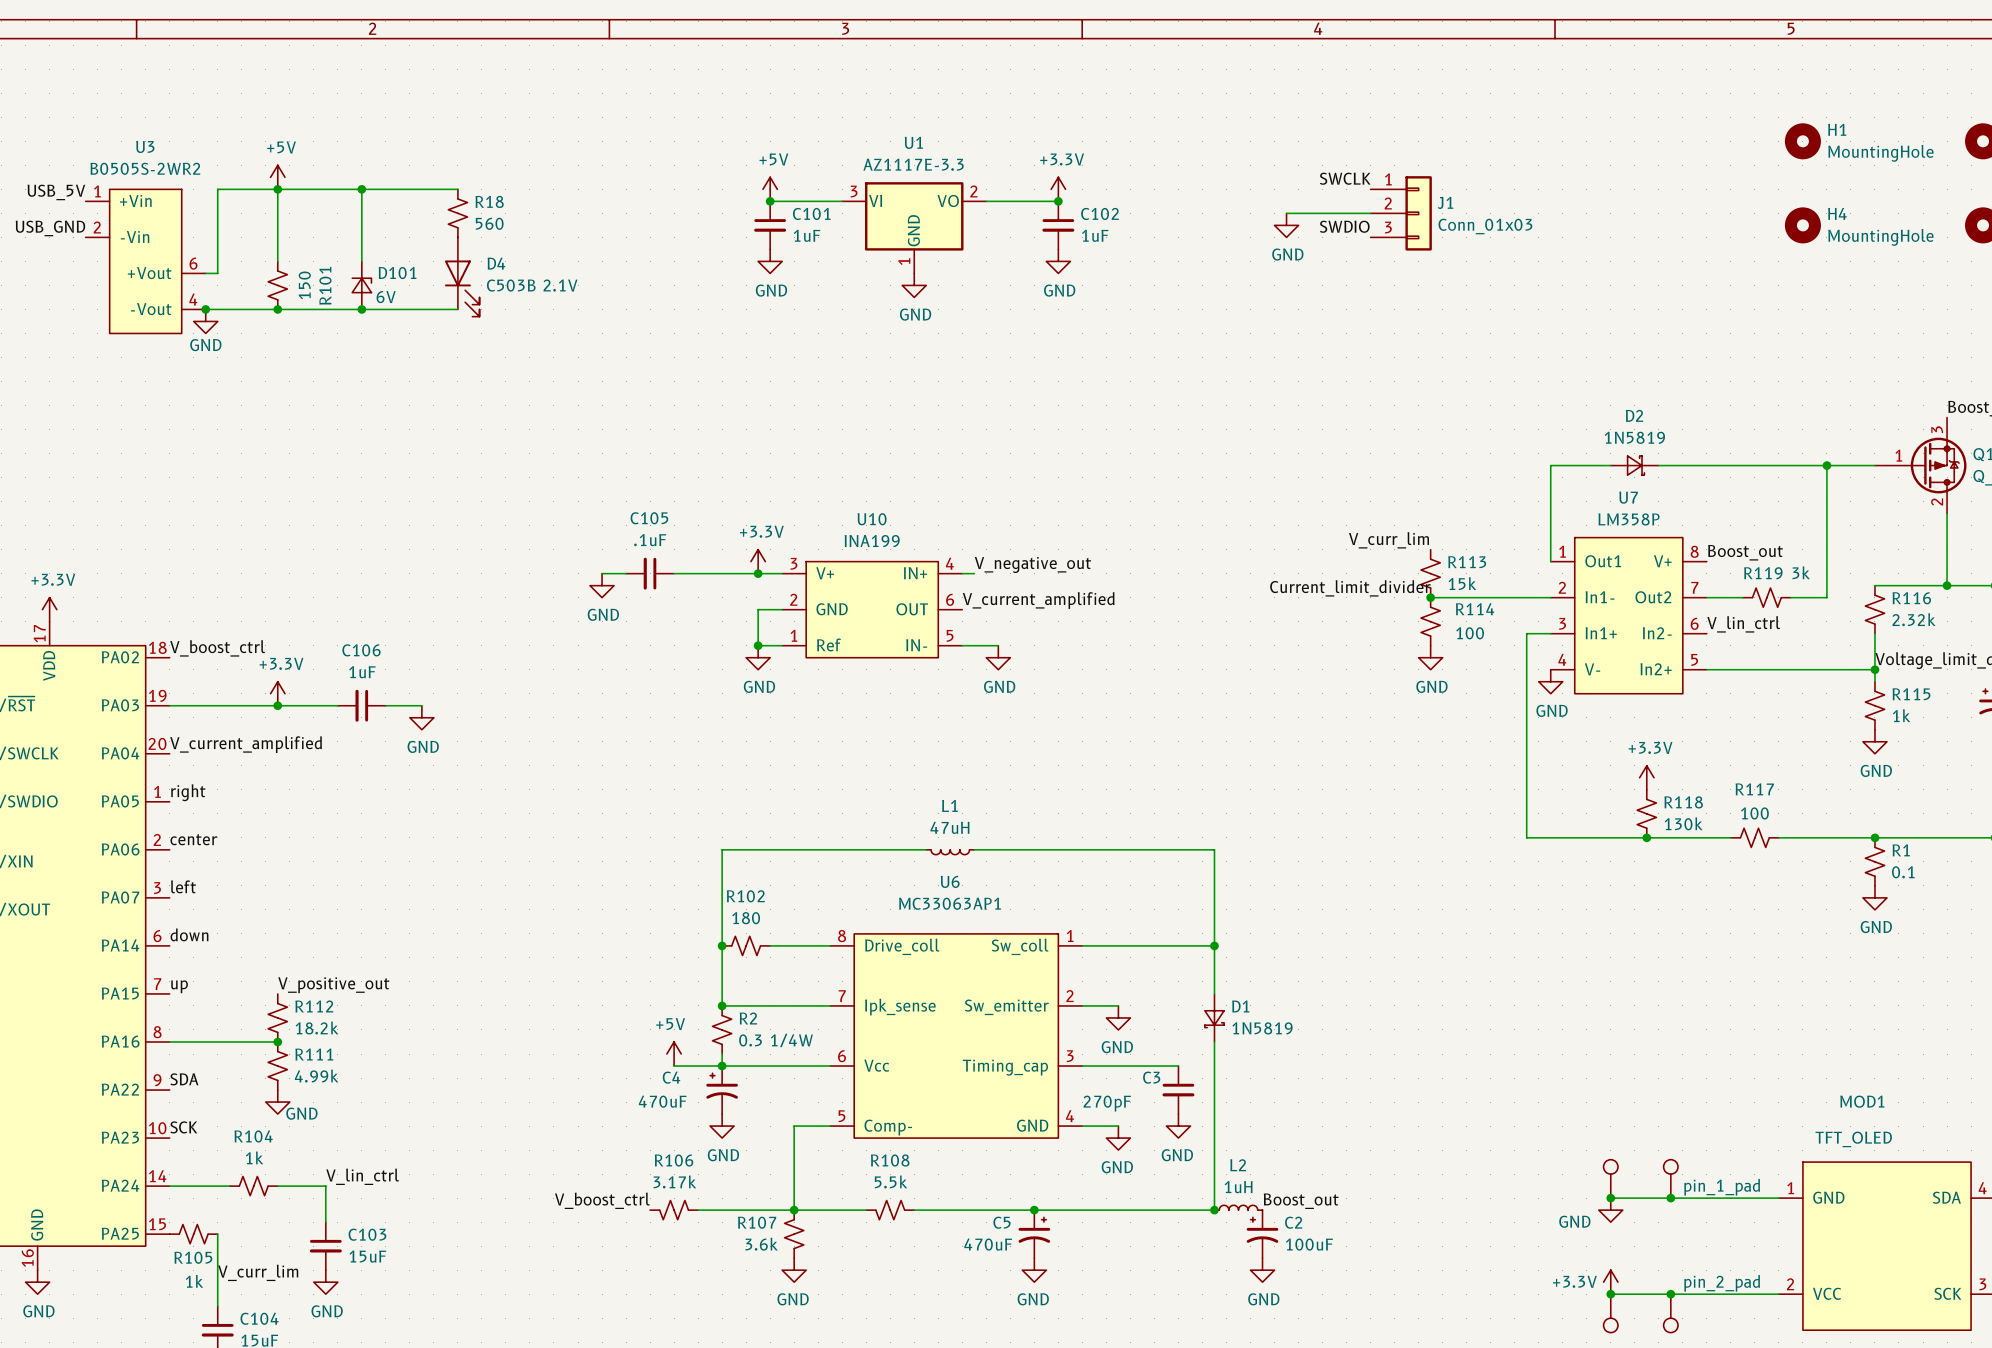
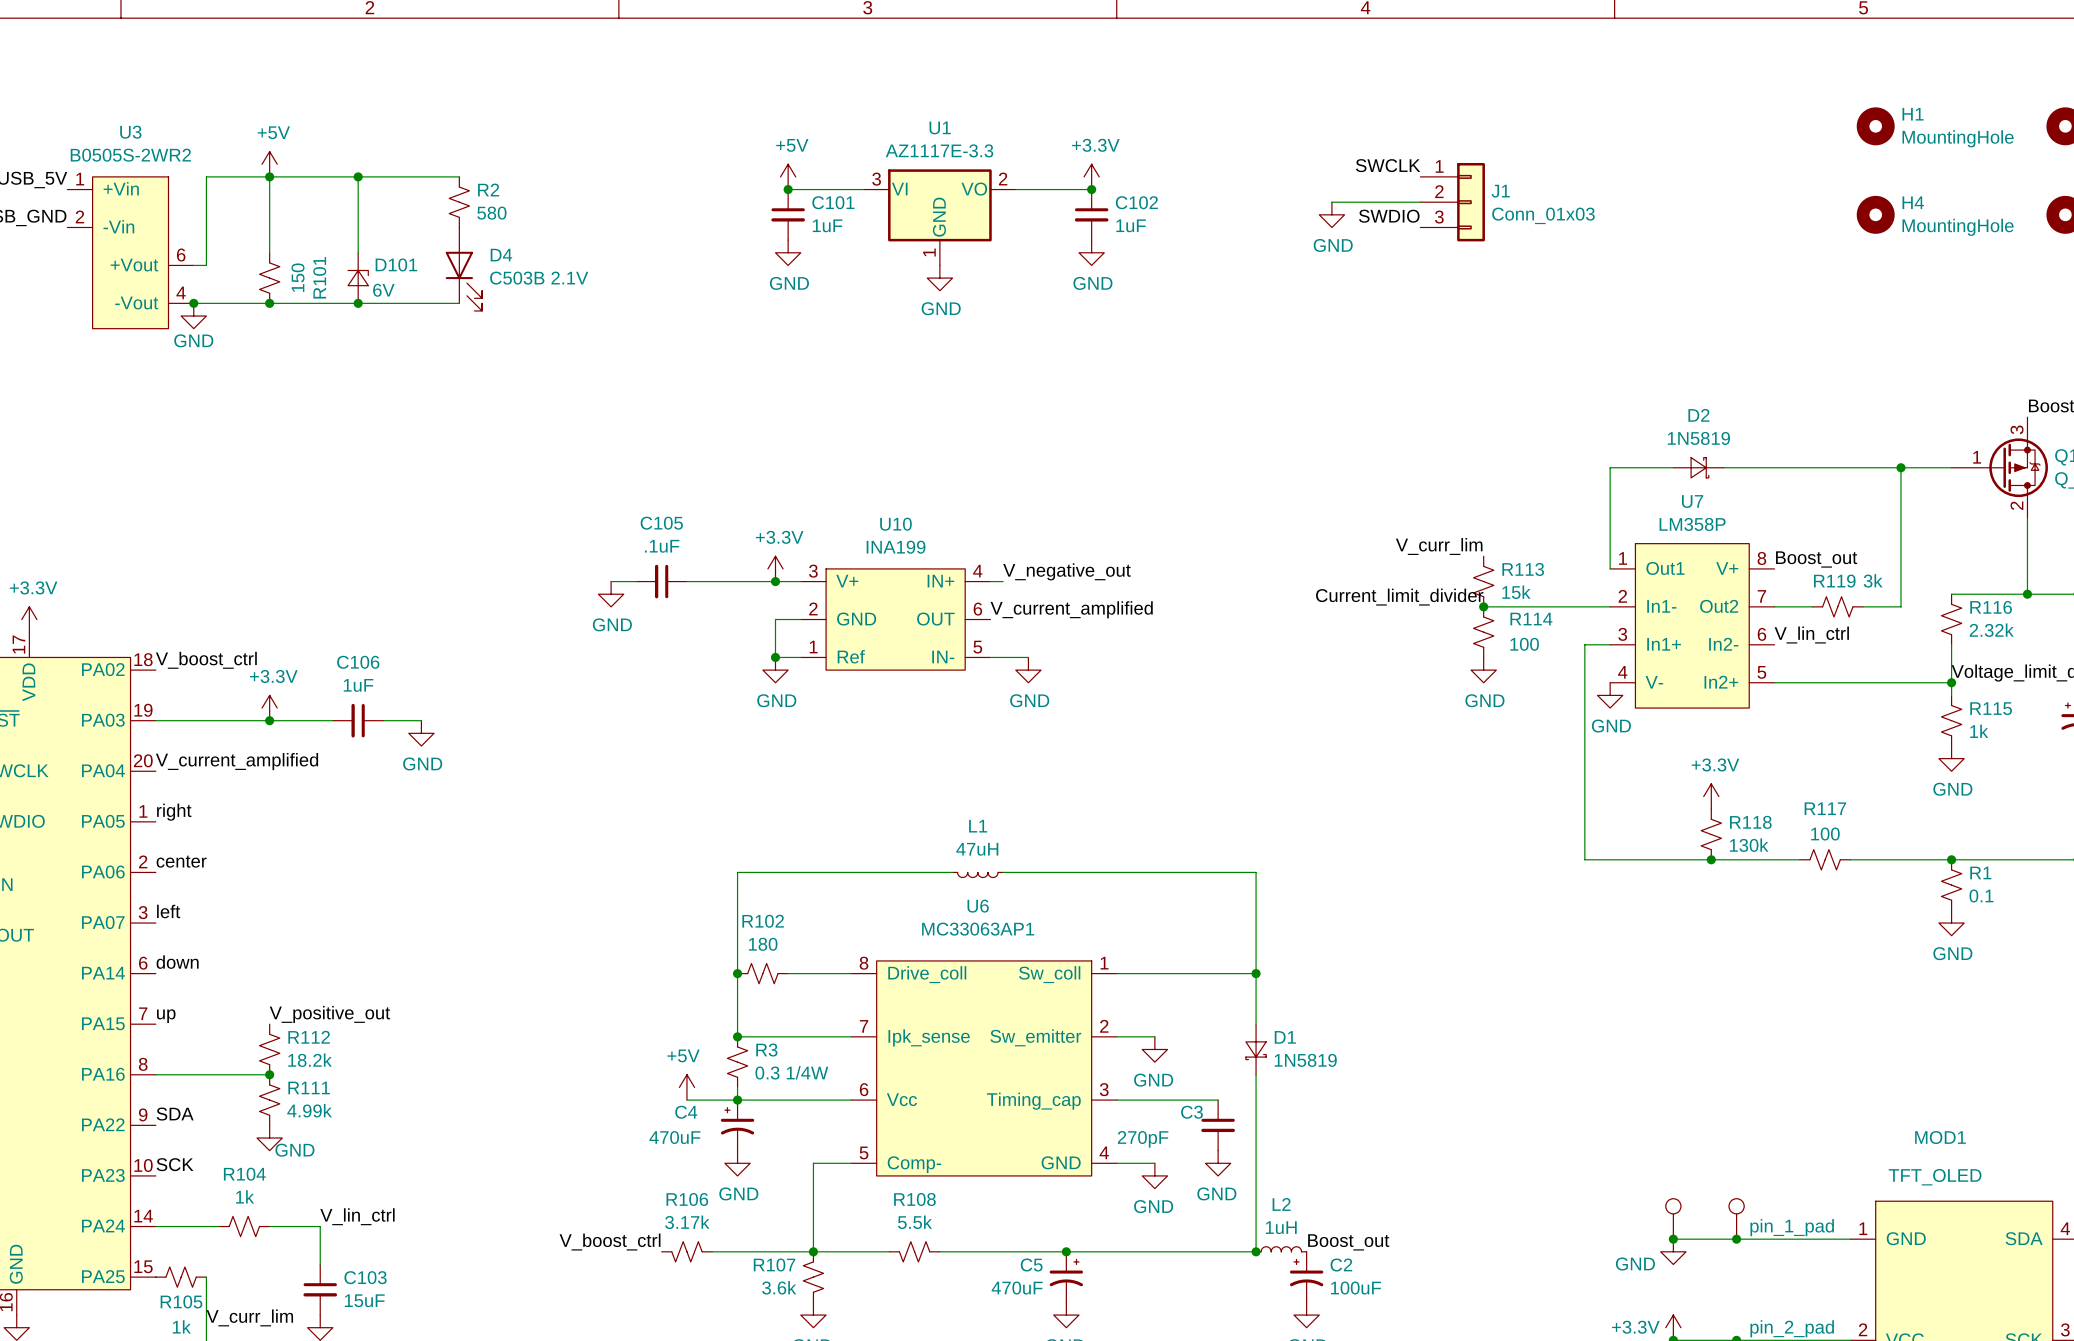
R18 name: R18 (489, 201) -> R2 (488, 189)
R18 value: 560 (489, 223) -> 580 (491, 213)
R2 name: R2 (748, 1018) -> R3 (766, 1050)

